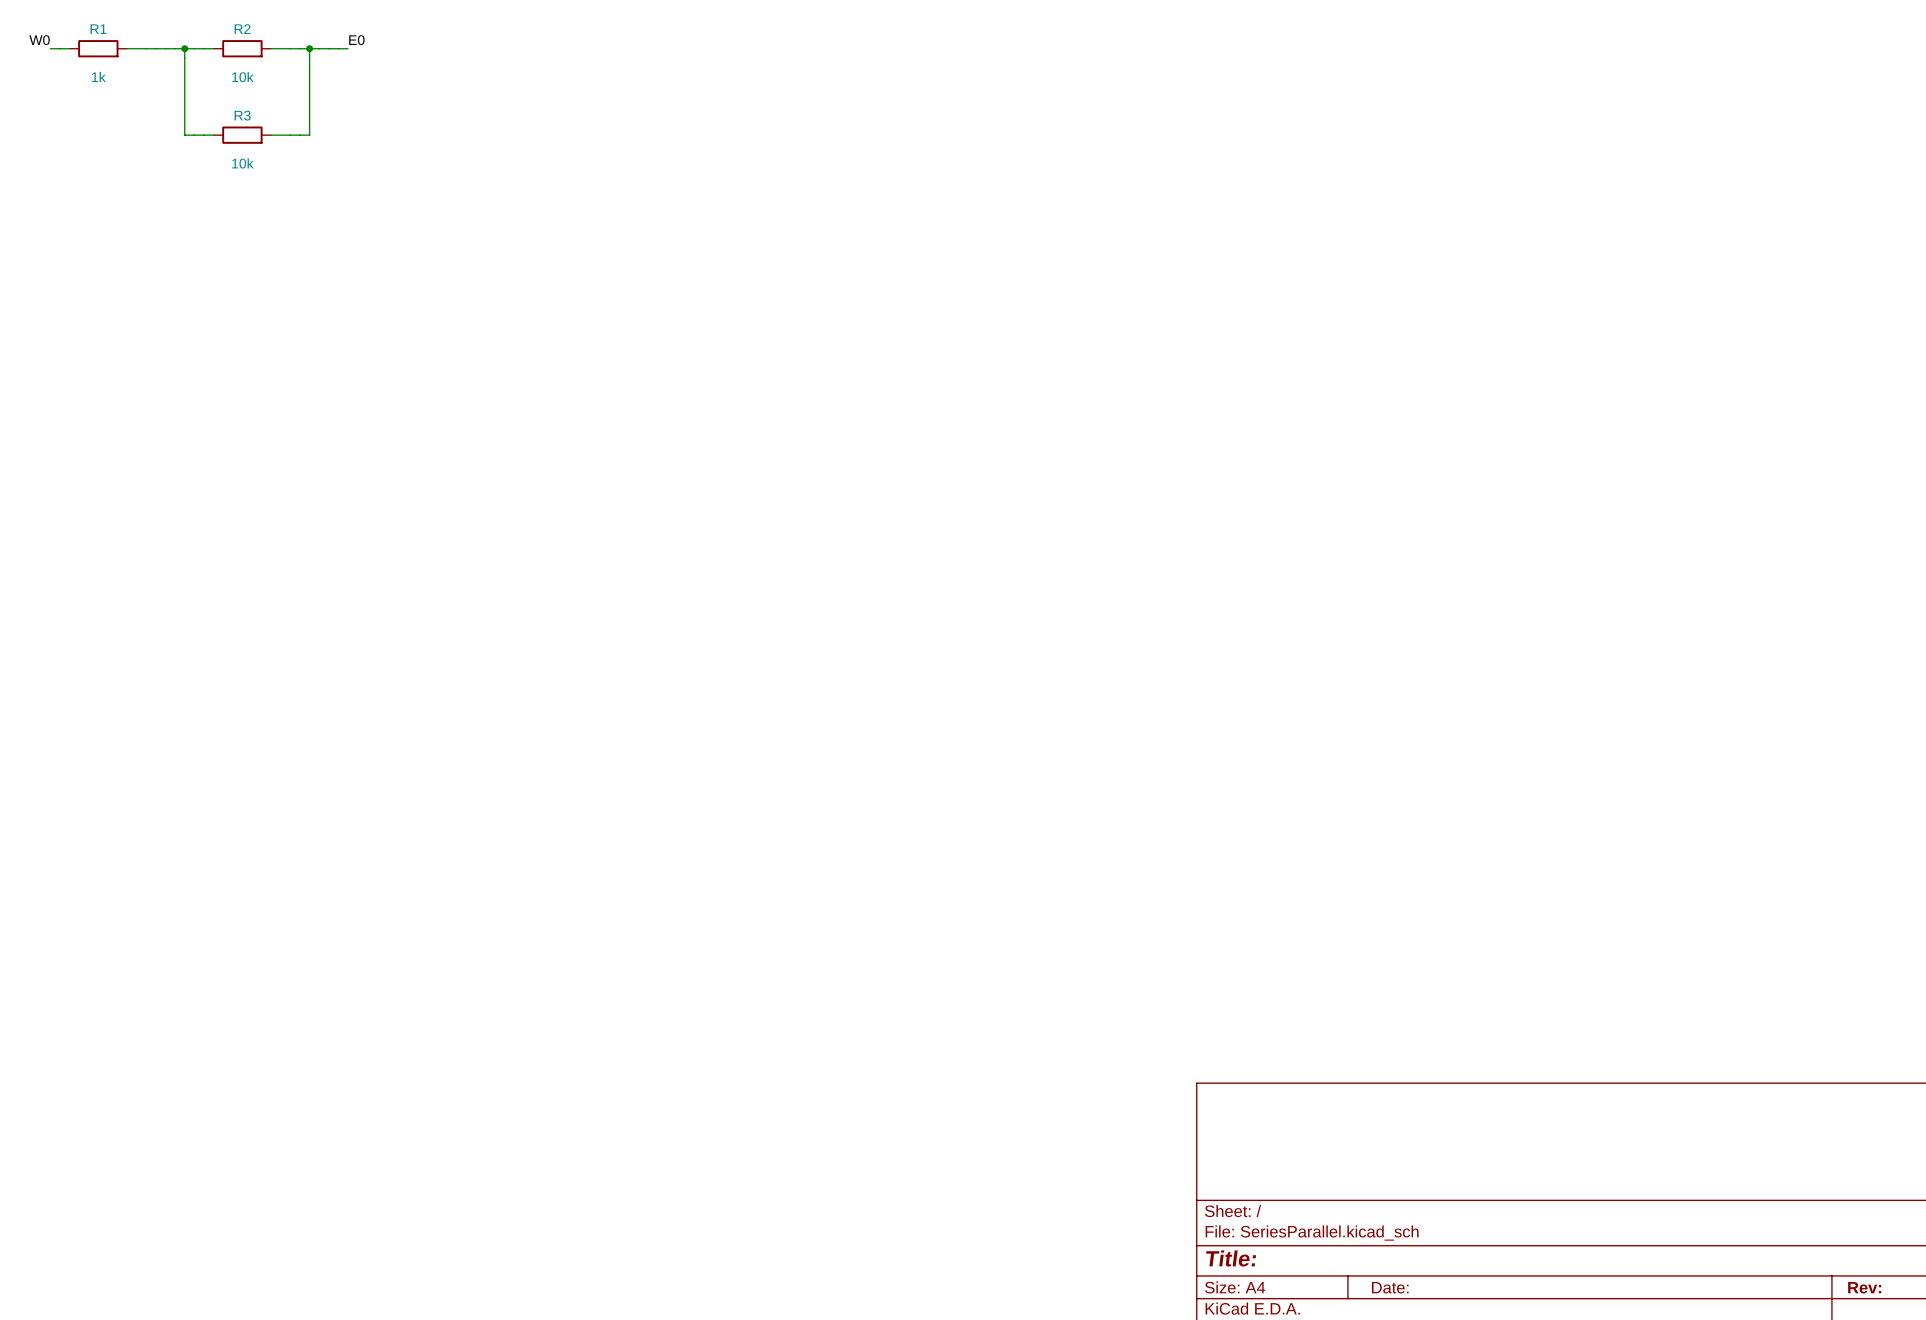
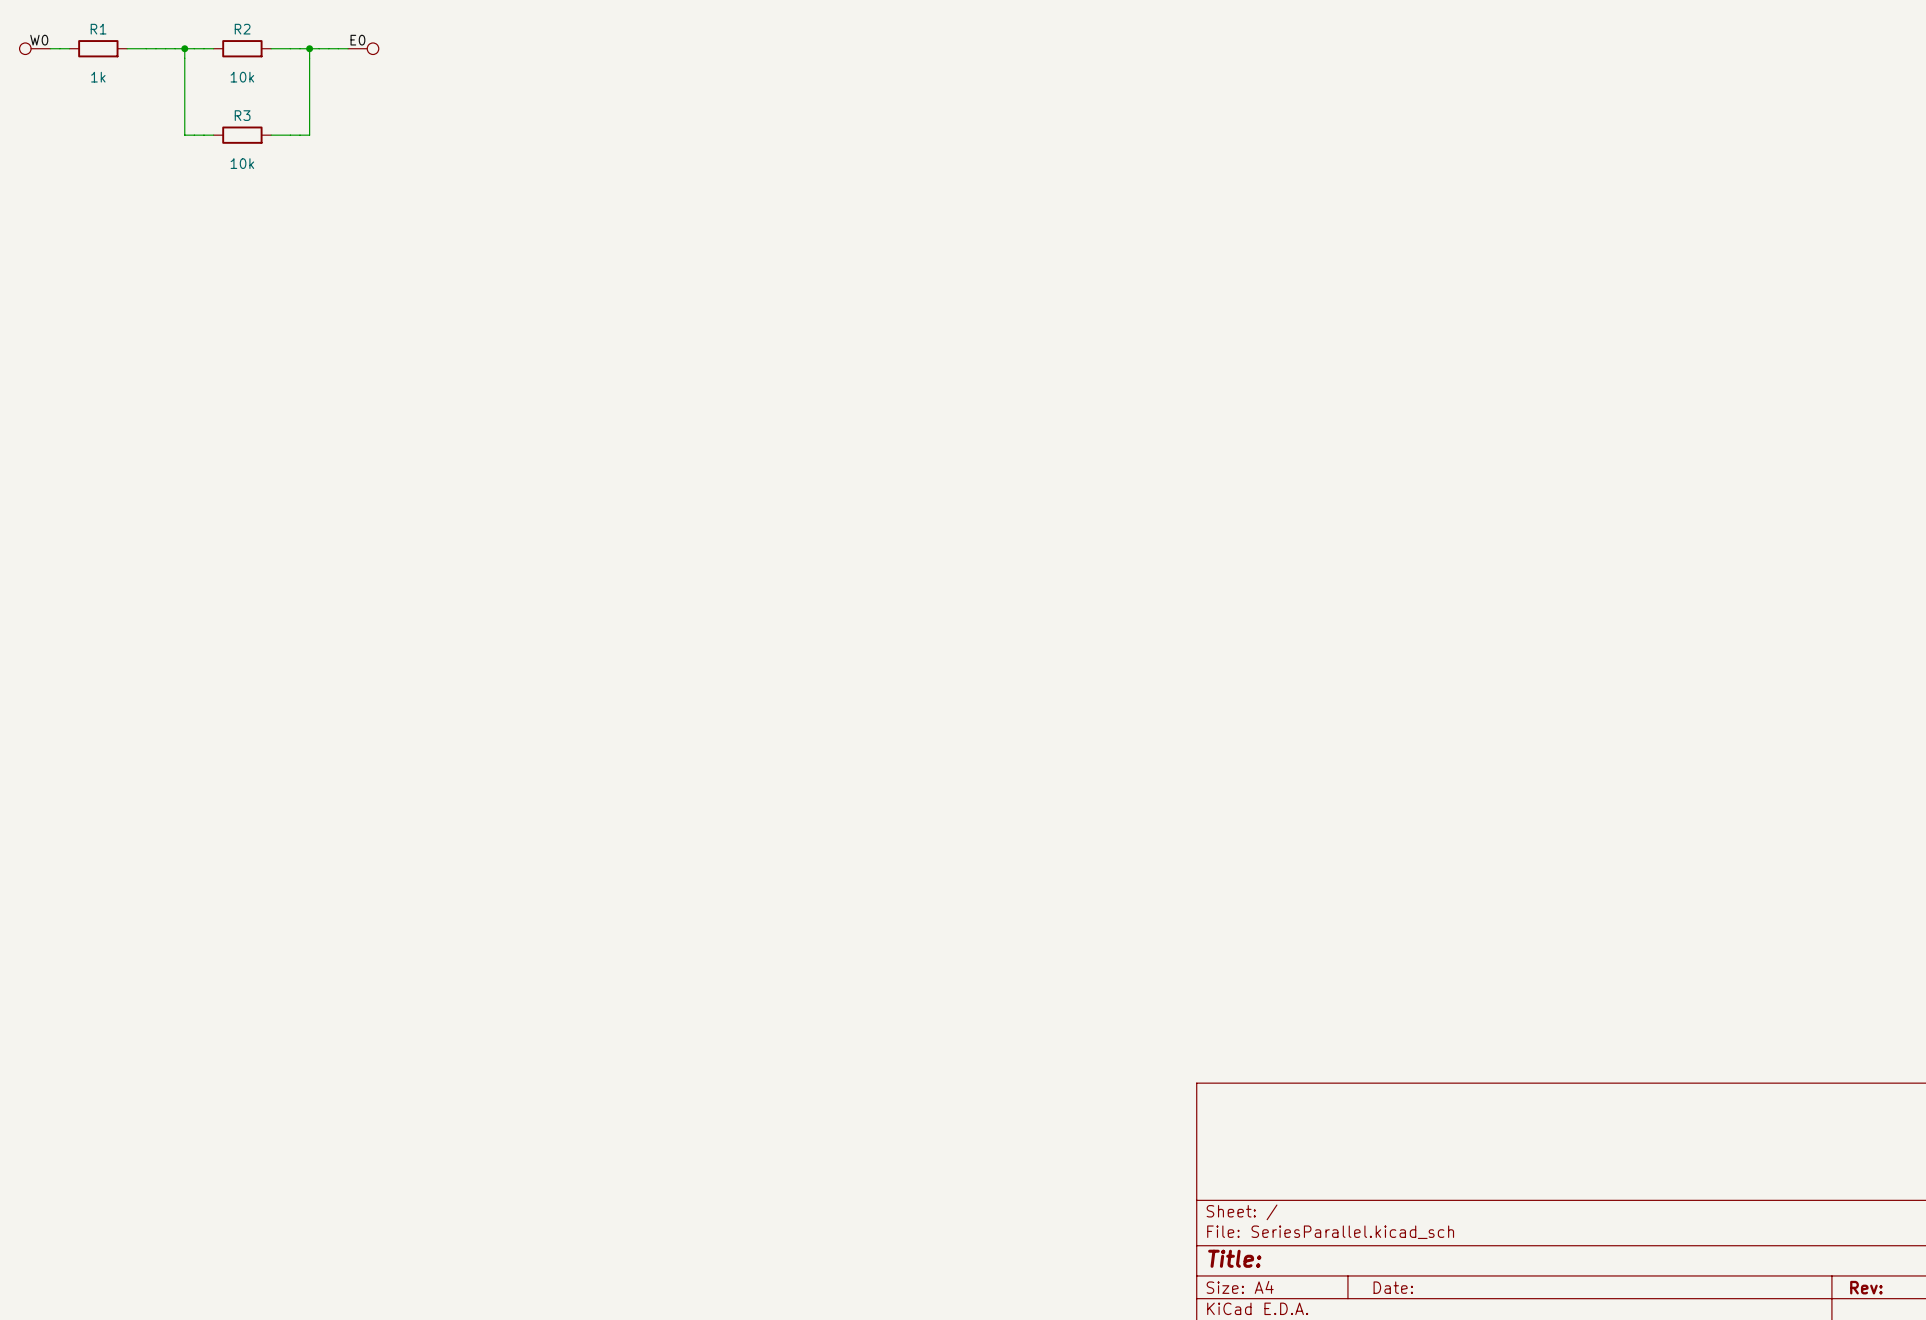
part: none -> (34, 48)
part: none -> (363, 48)

